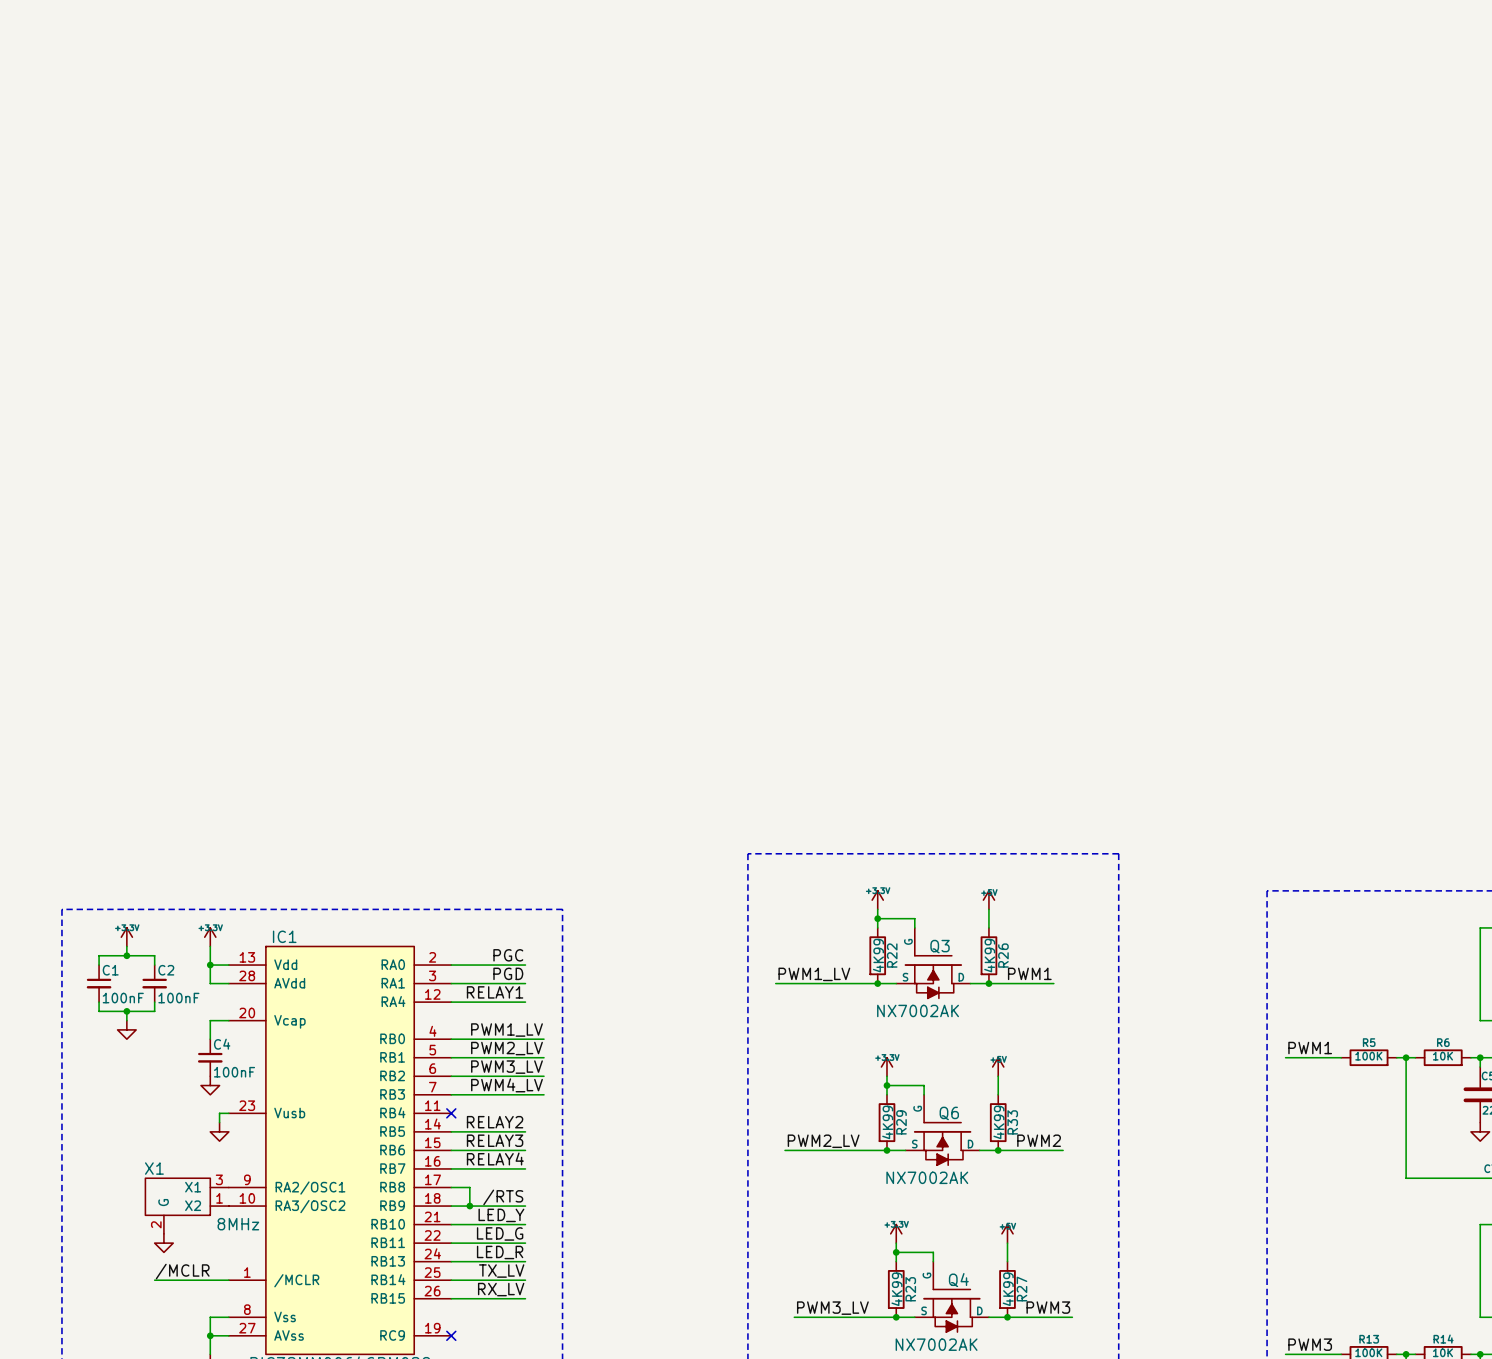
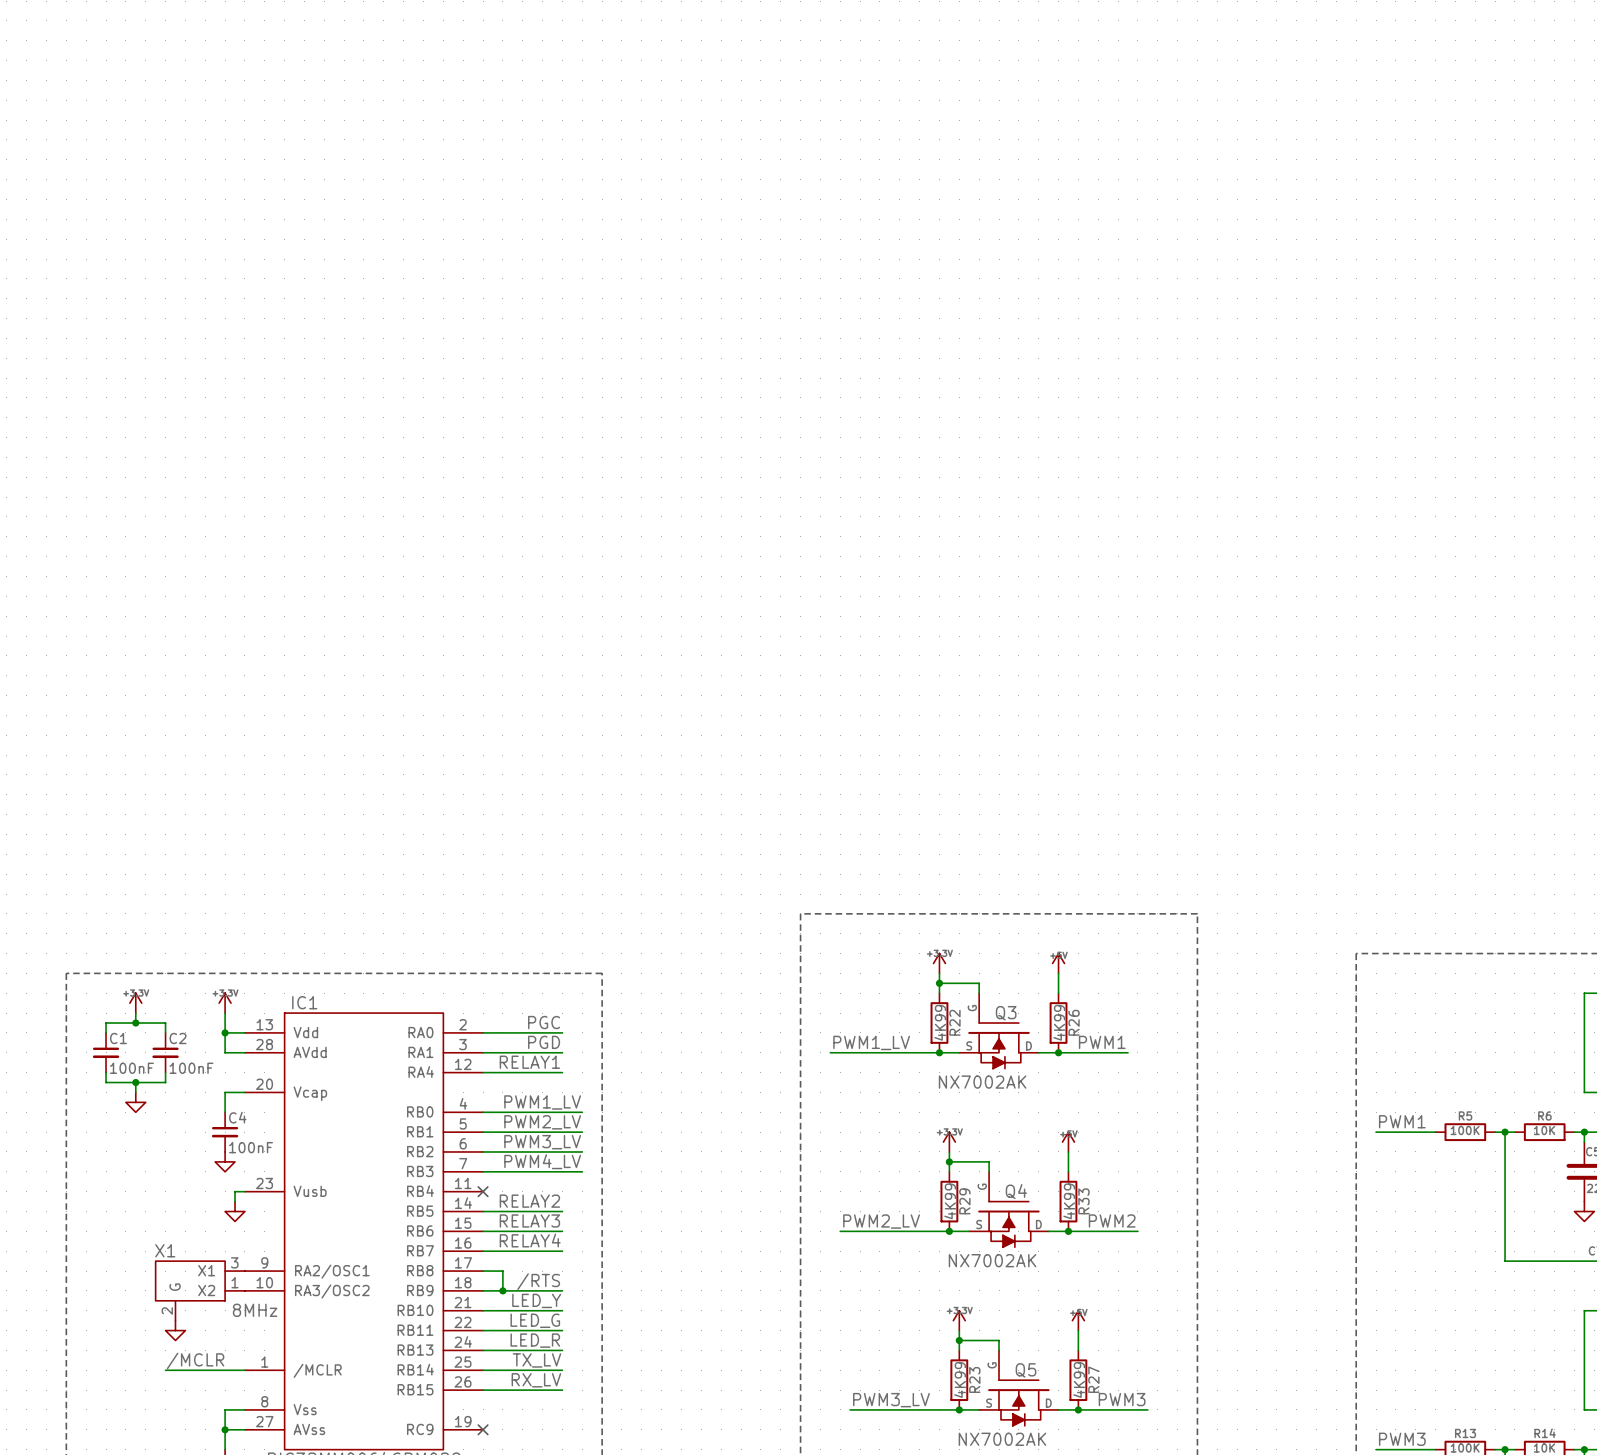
Q6 name: Q6 (949, 1113) -> Q4 (1016, 1191)
Q4 name: Q4 (958, 1280) -> Q5 (1026, 1370)

